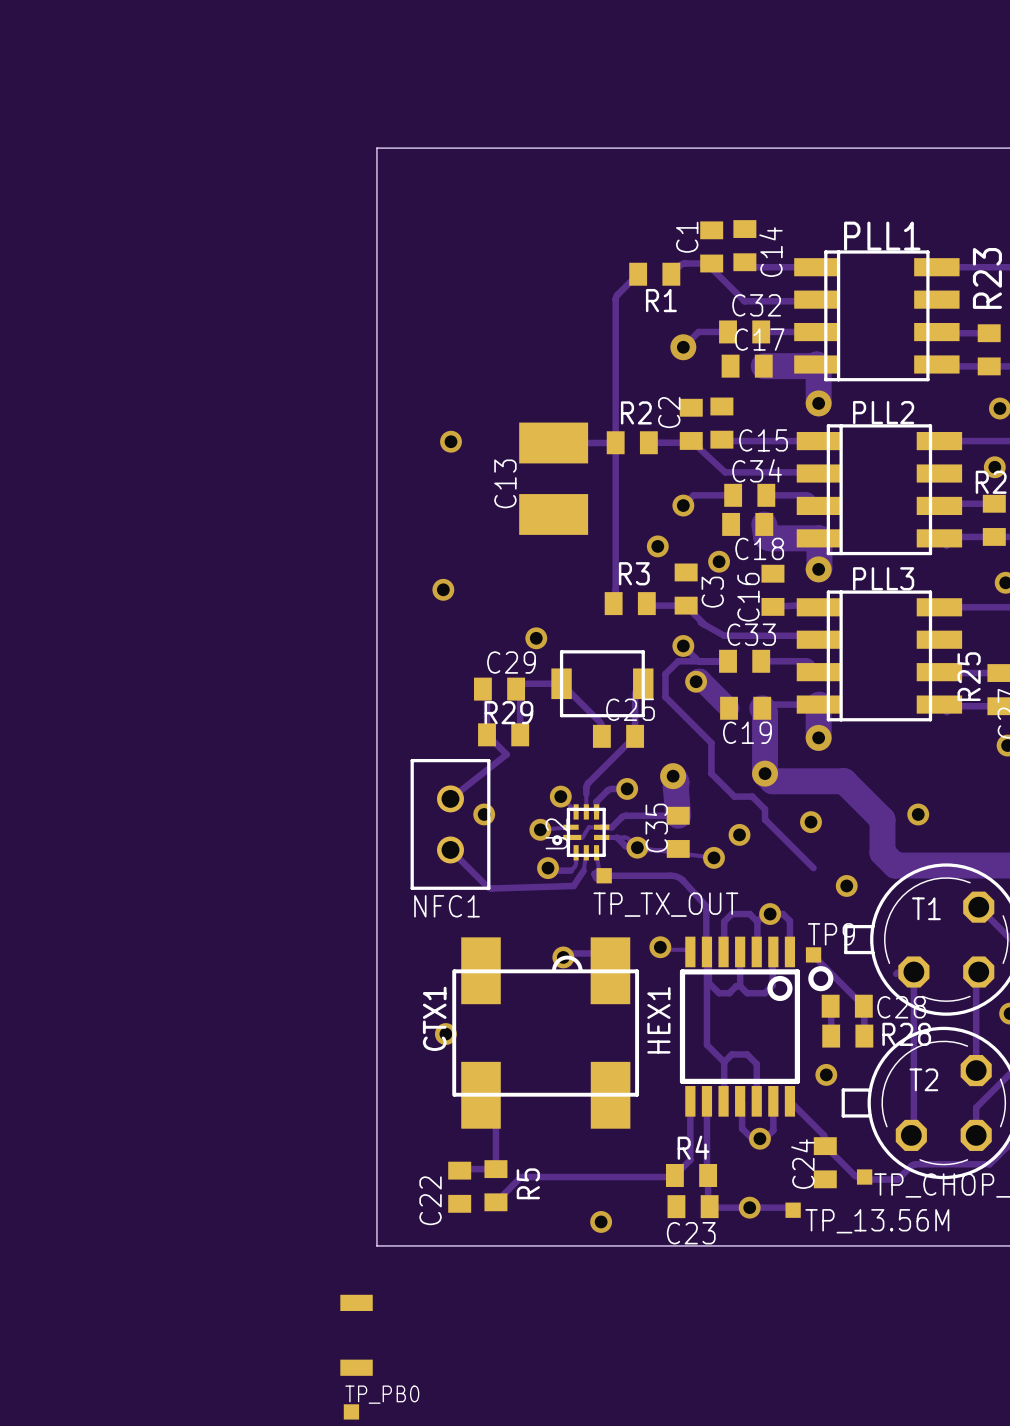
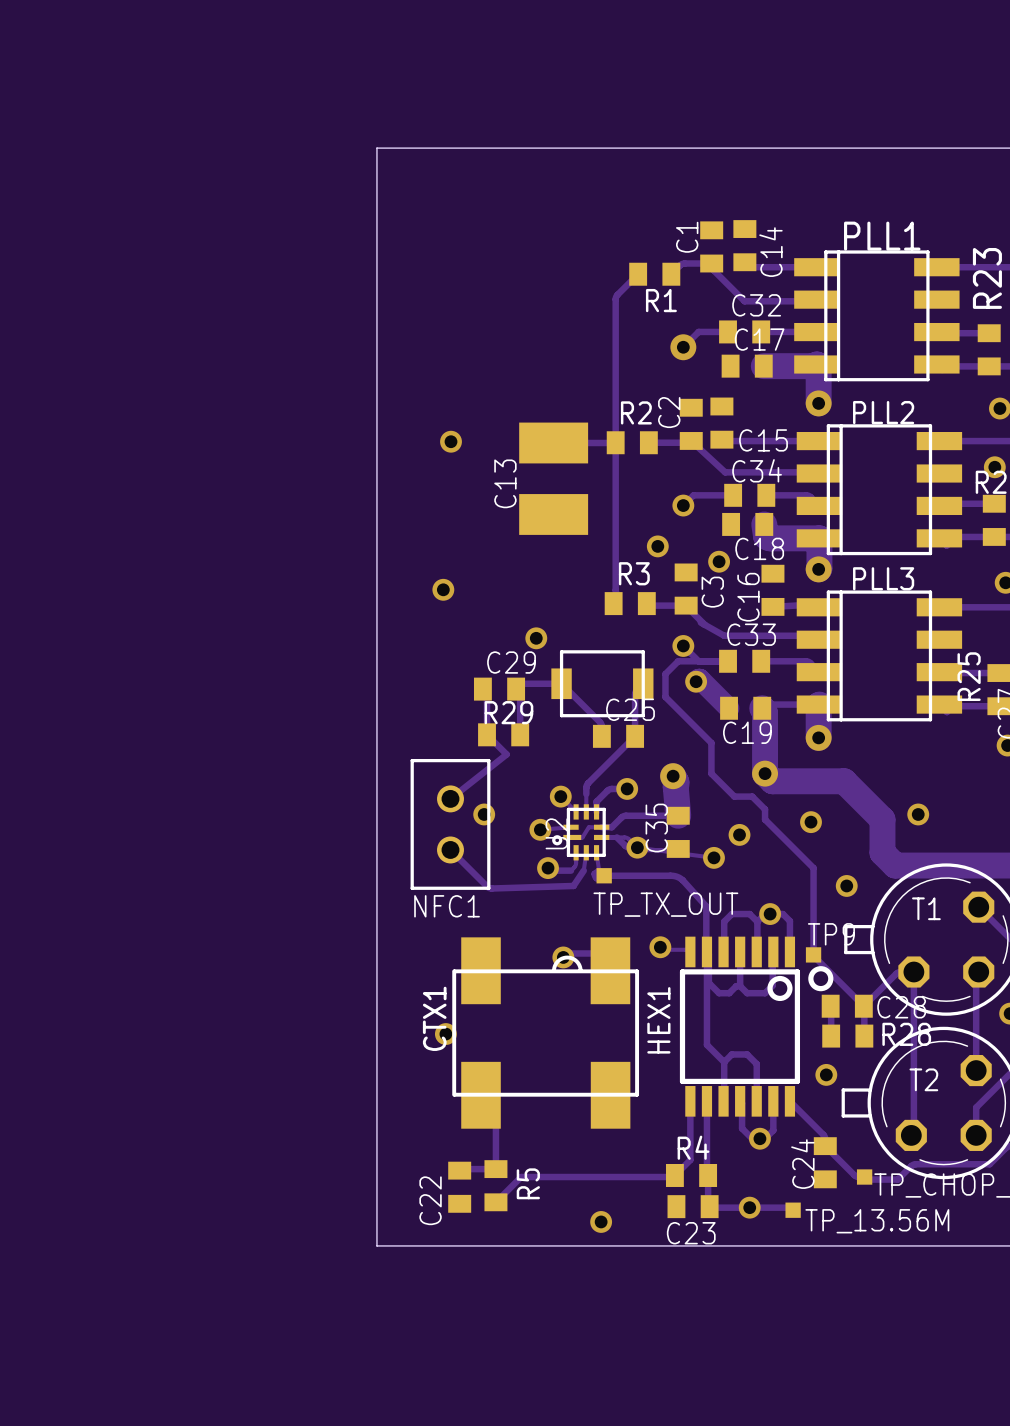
track: none -> (813, 868) (813, 954)
track: none -> (896, 973) (863, 1006)
part: (356, 1335) -> none
TP_PB0: (351, 1411) -> none

